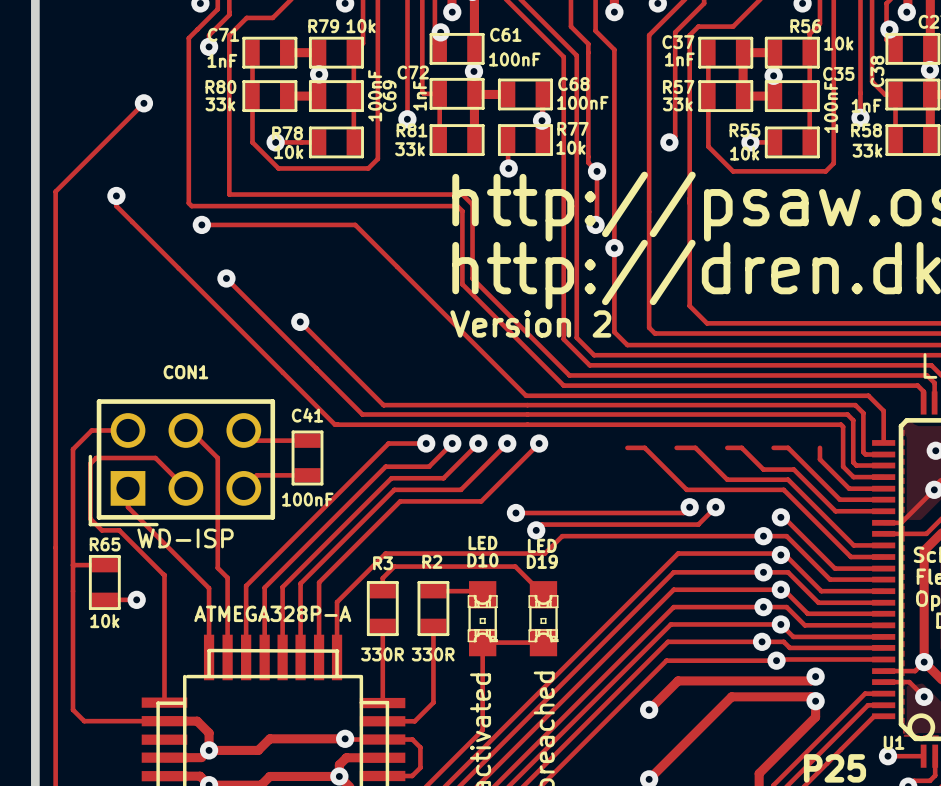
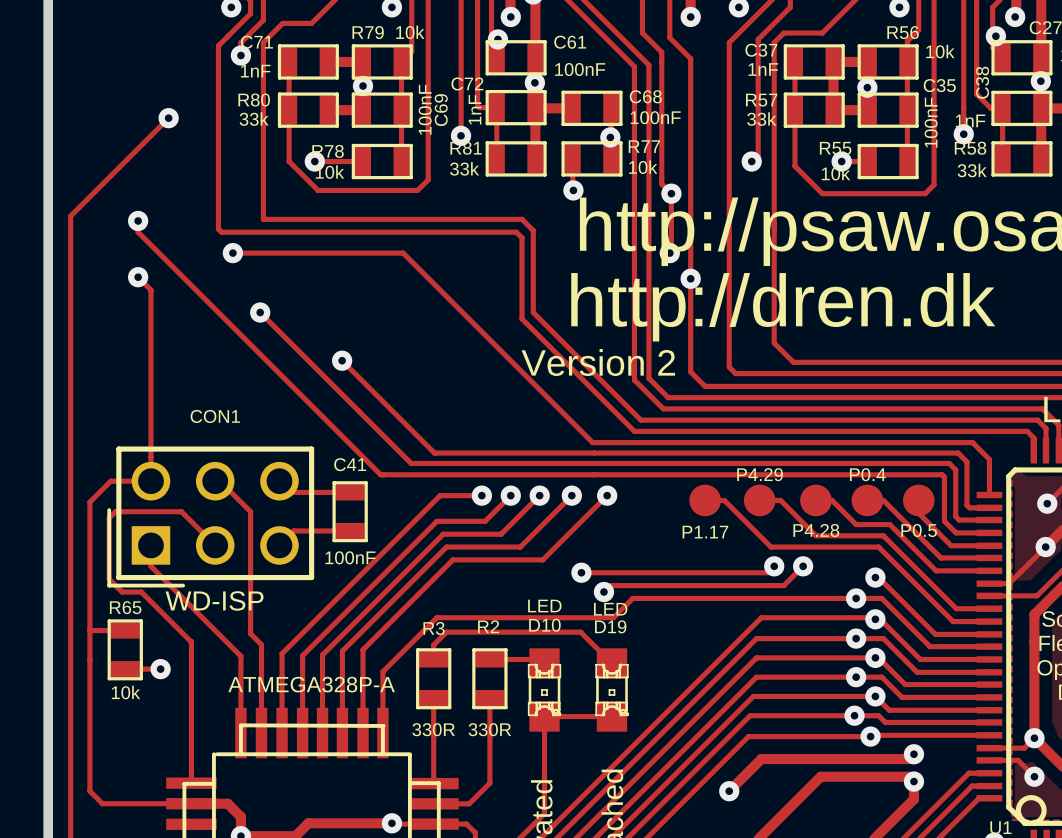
track: none -> (138, 277) (150, 290) (150, 481)
via: none -> (138, 277)
P1.17: none -> (705, 500)
P4.29: none -> (759, 500)
P4.28: none -> (815, 500)
P0.4: none -> (867, 500)
P0.5: none -> (918, 500)

